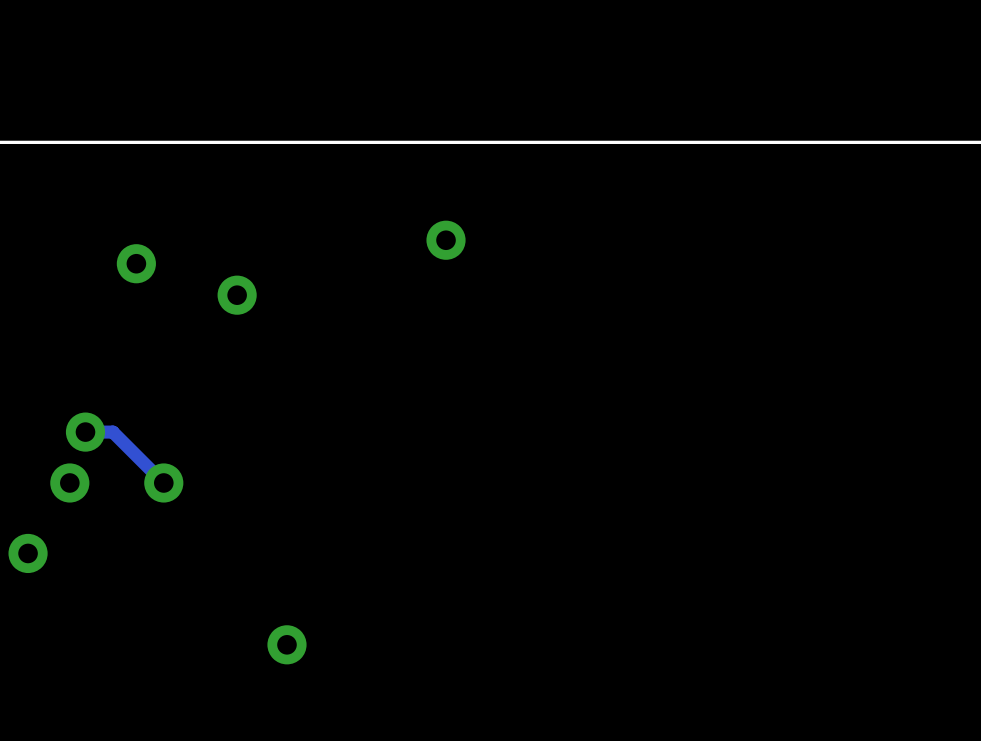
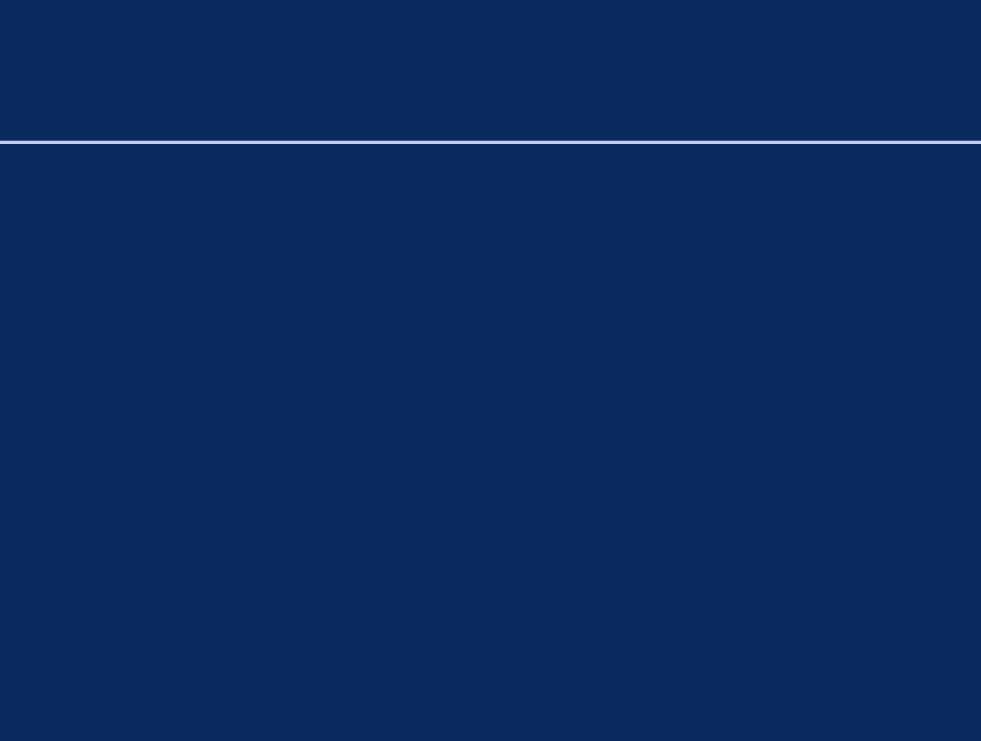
via: (446, 240) -> none
via: (136, 263) -> none
via: (237, 295) -> none
track: (85, 432) (112, 432) (163, 482) -> none
via: (85, 432) -> none
via: (69, 482) -> none
via: (163, 482) -> none
via: (28, 553) -> none
via: (286, 644) -> none

